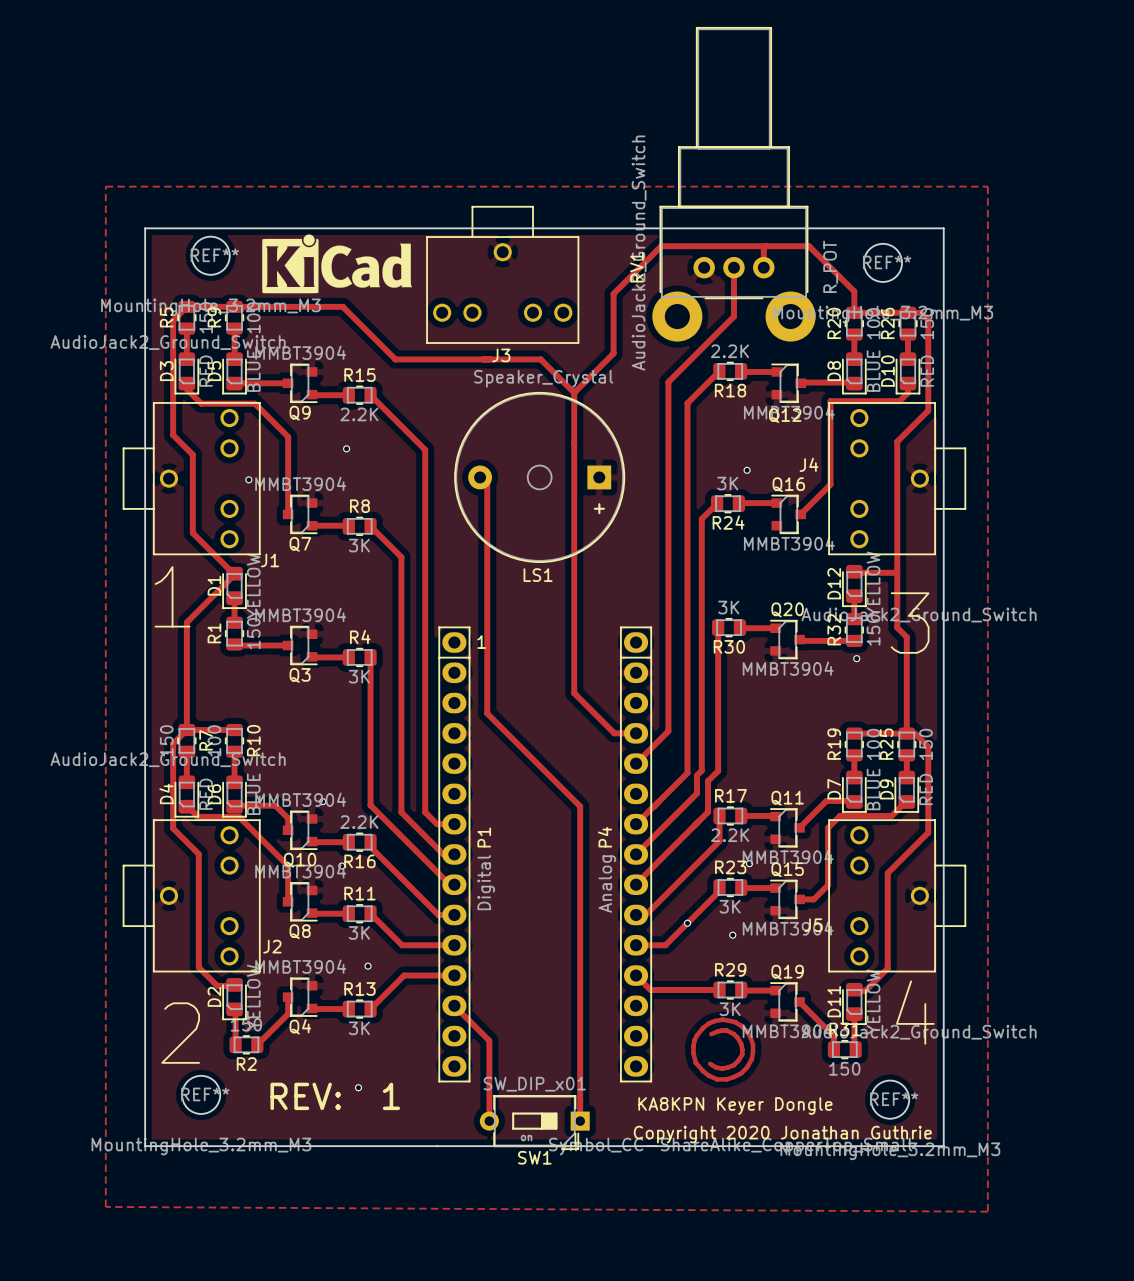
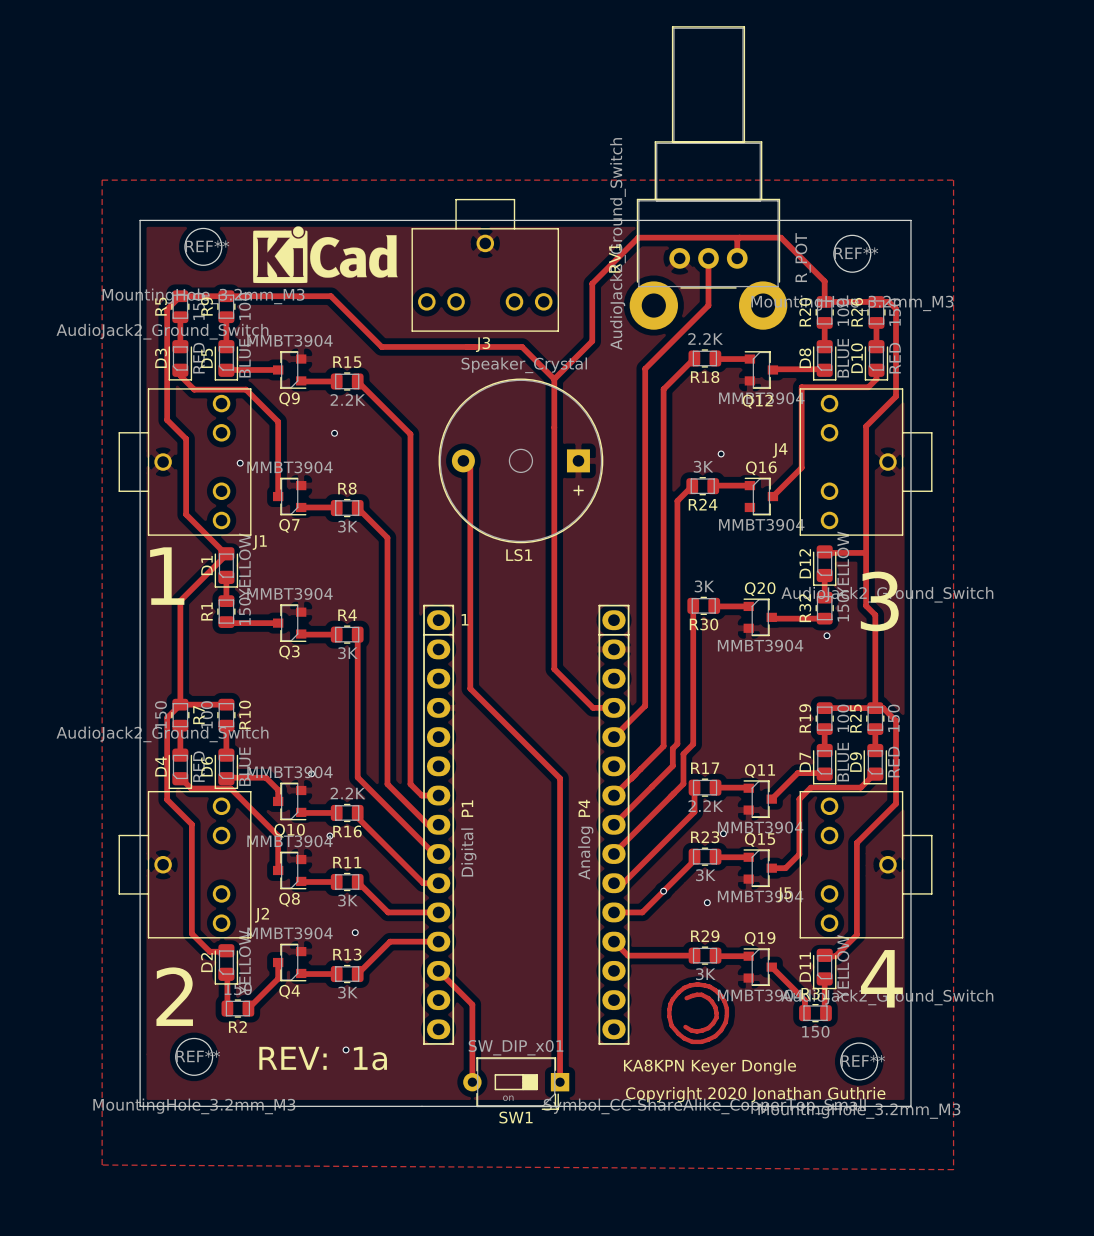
text: REV: 1 (335, 1096) -> REV: 1a (323, 1058)

